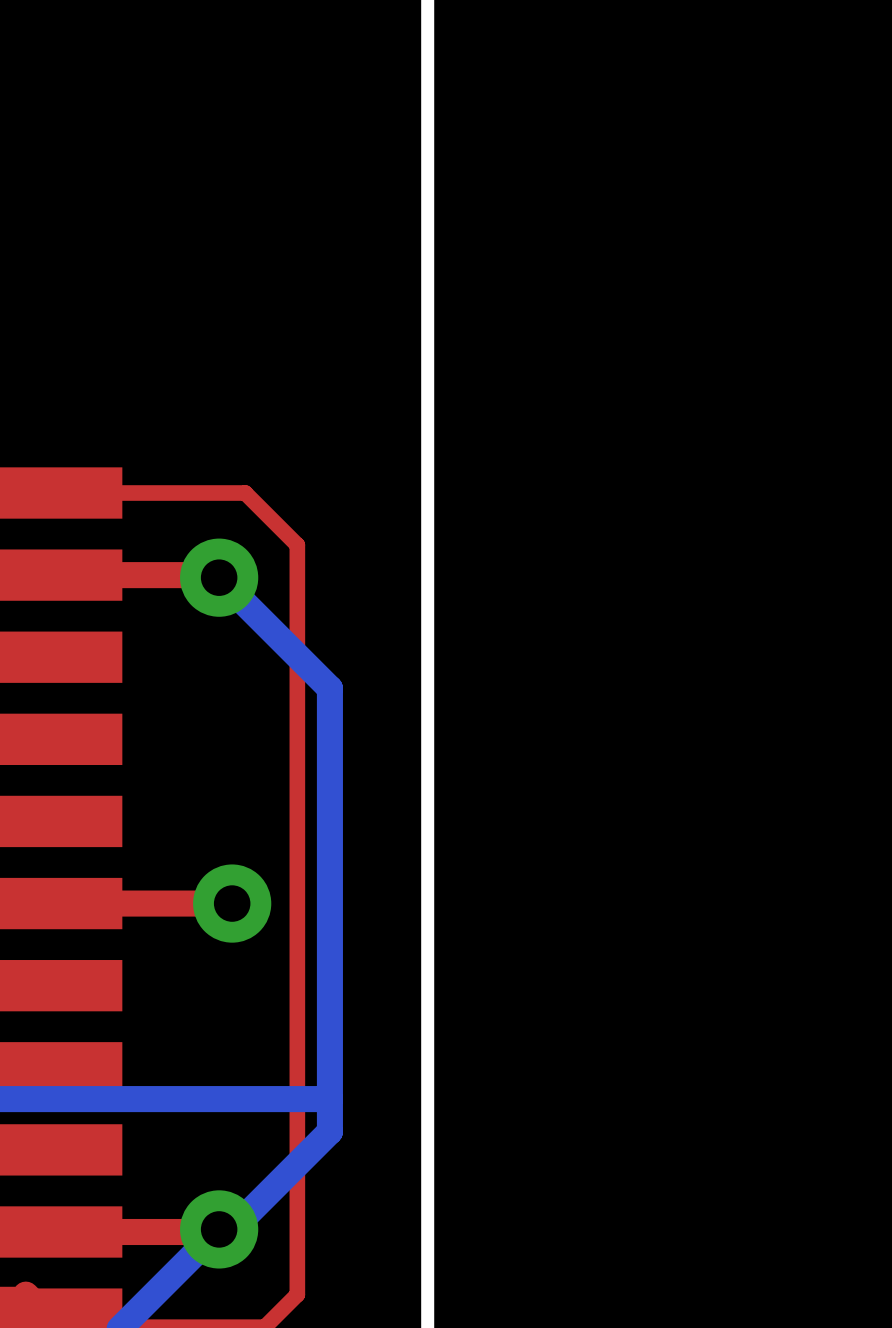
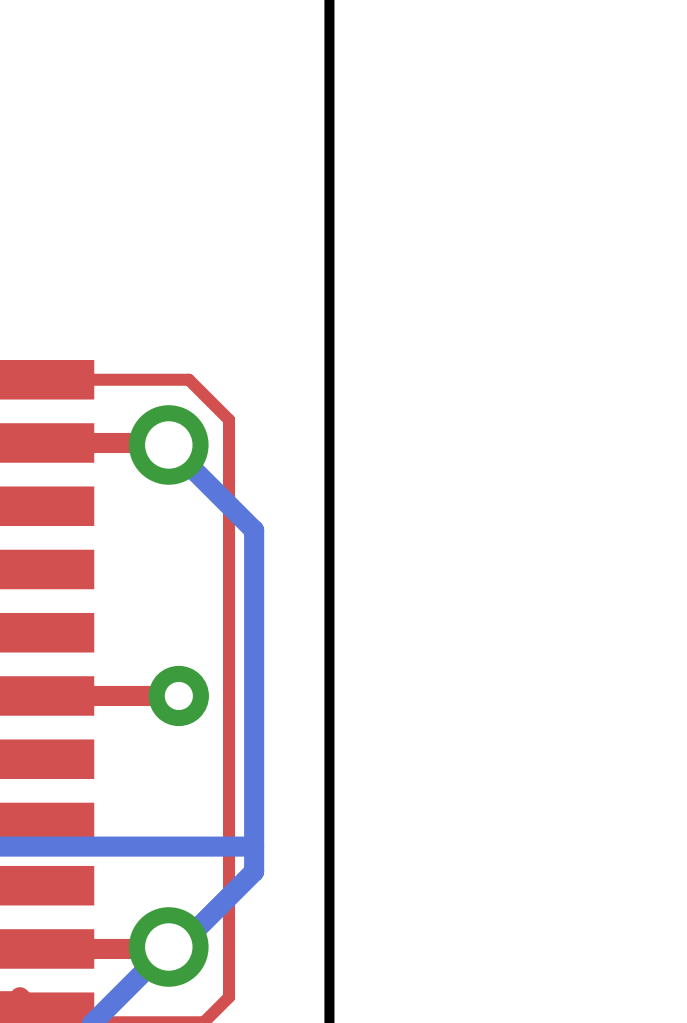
via size: [180, 538, 259, 617] -> [129, 405, 209, 485]
via size: [180, 1190, 259, 1269] -> [129, 907, 209, 987]

